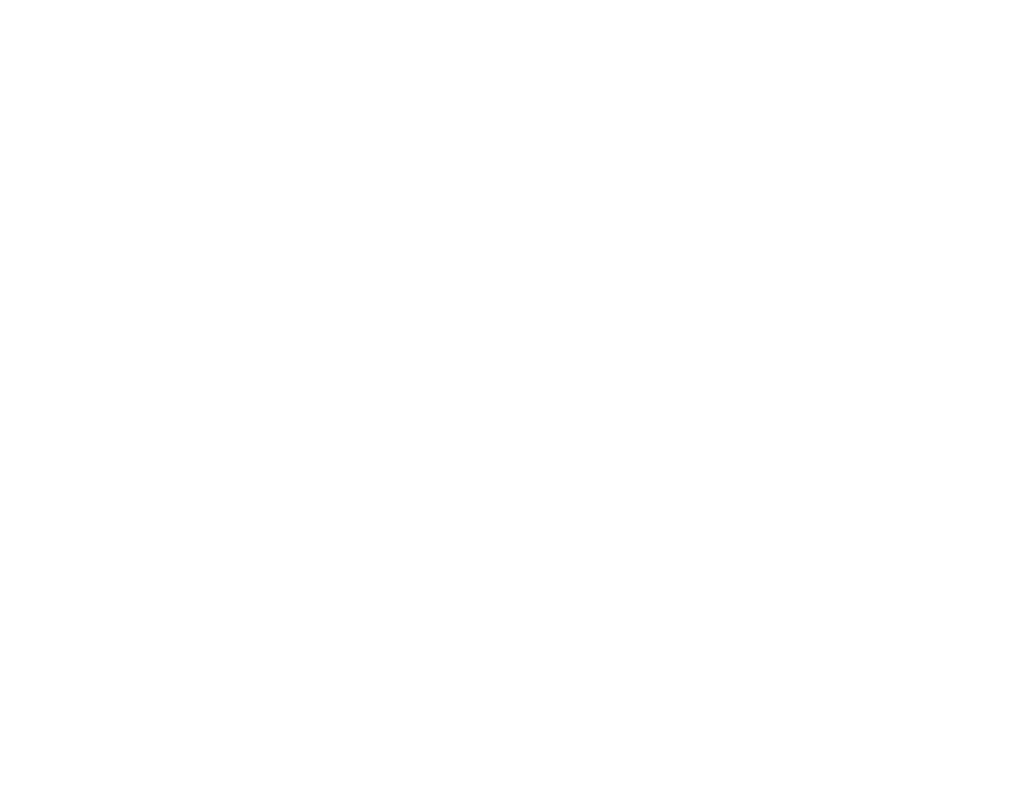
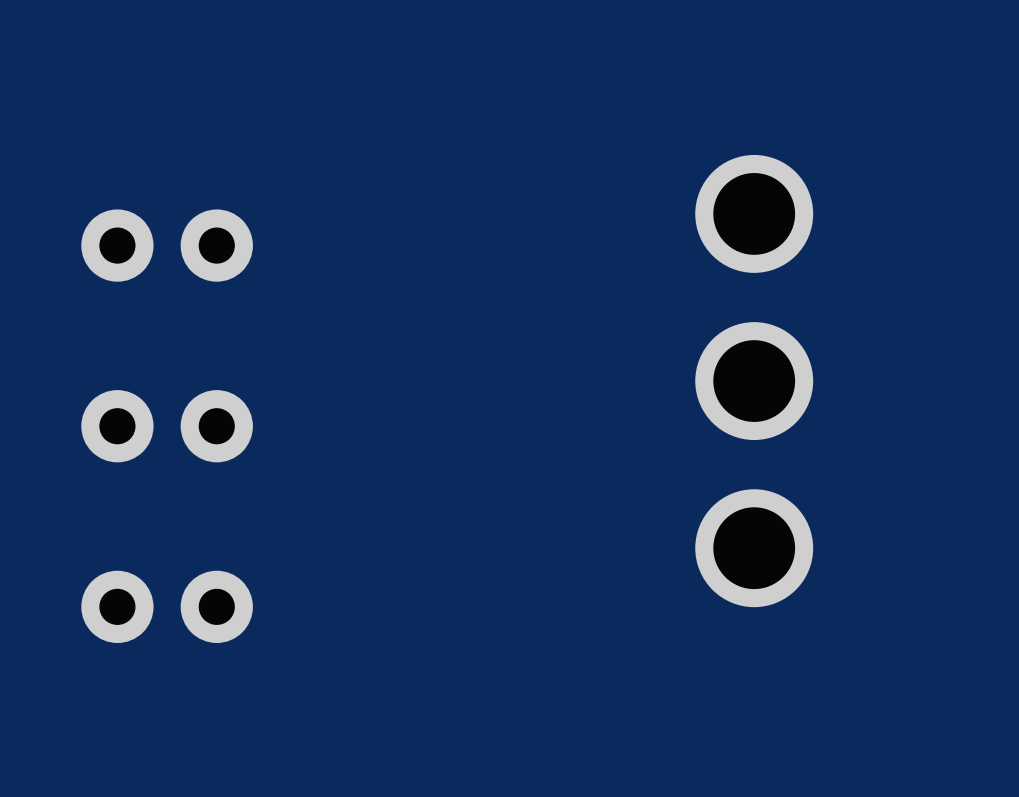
part: none -> (167, 245)
part: none -> (754, 381)
part: none -> (167, 426)
part: none -> (167, 606)

